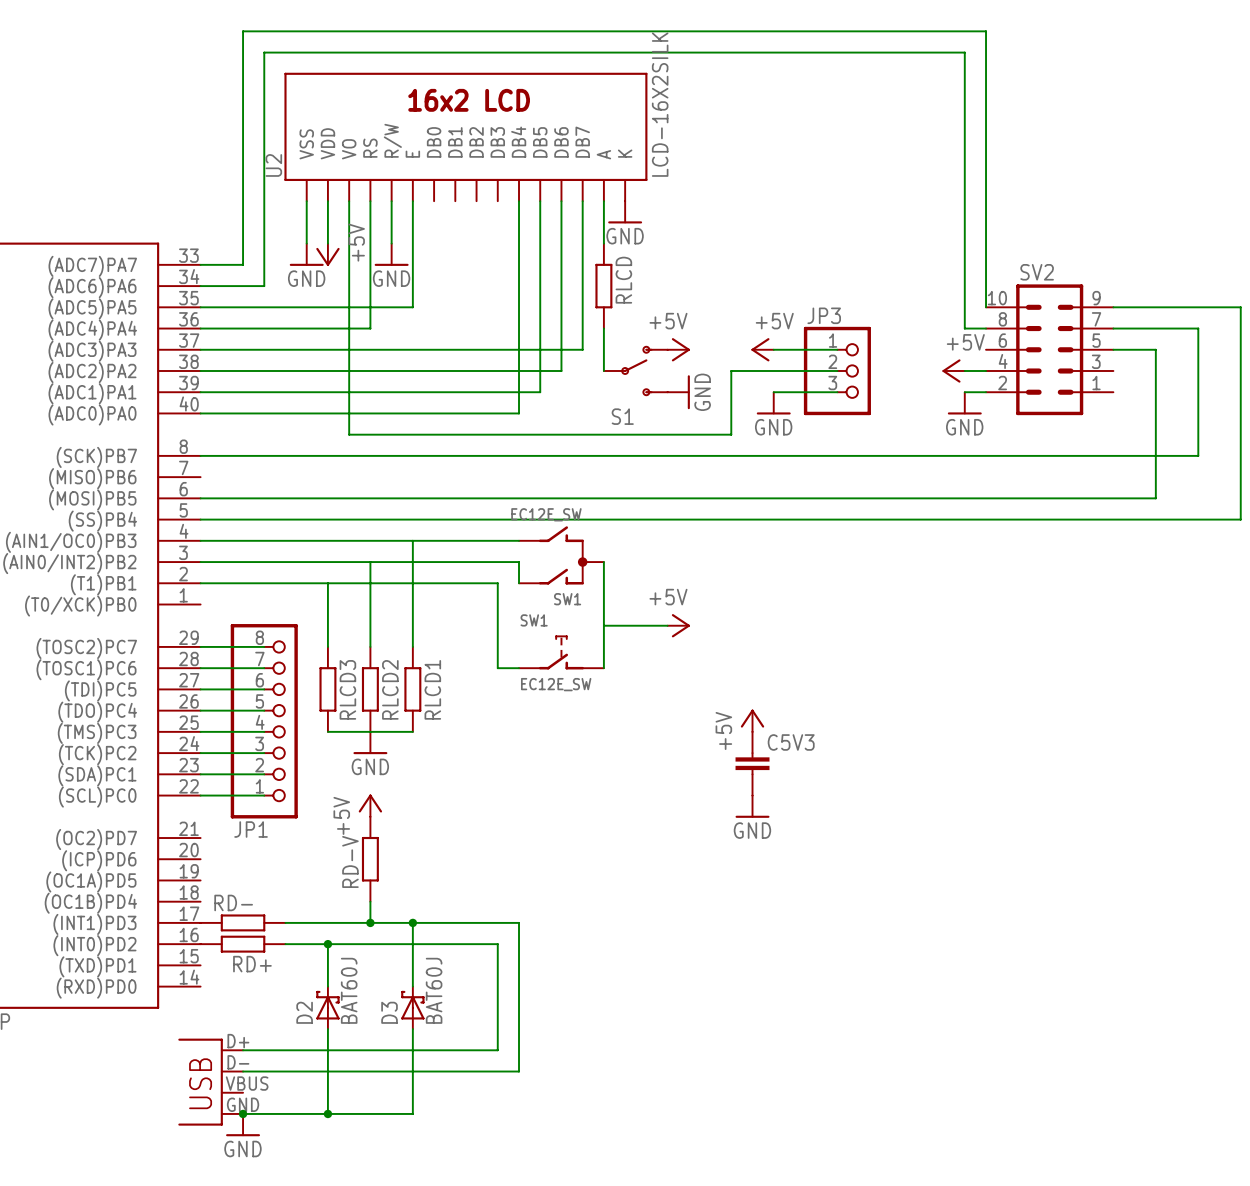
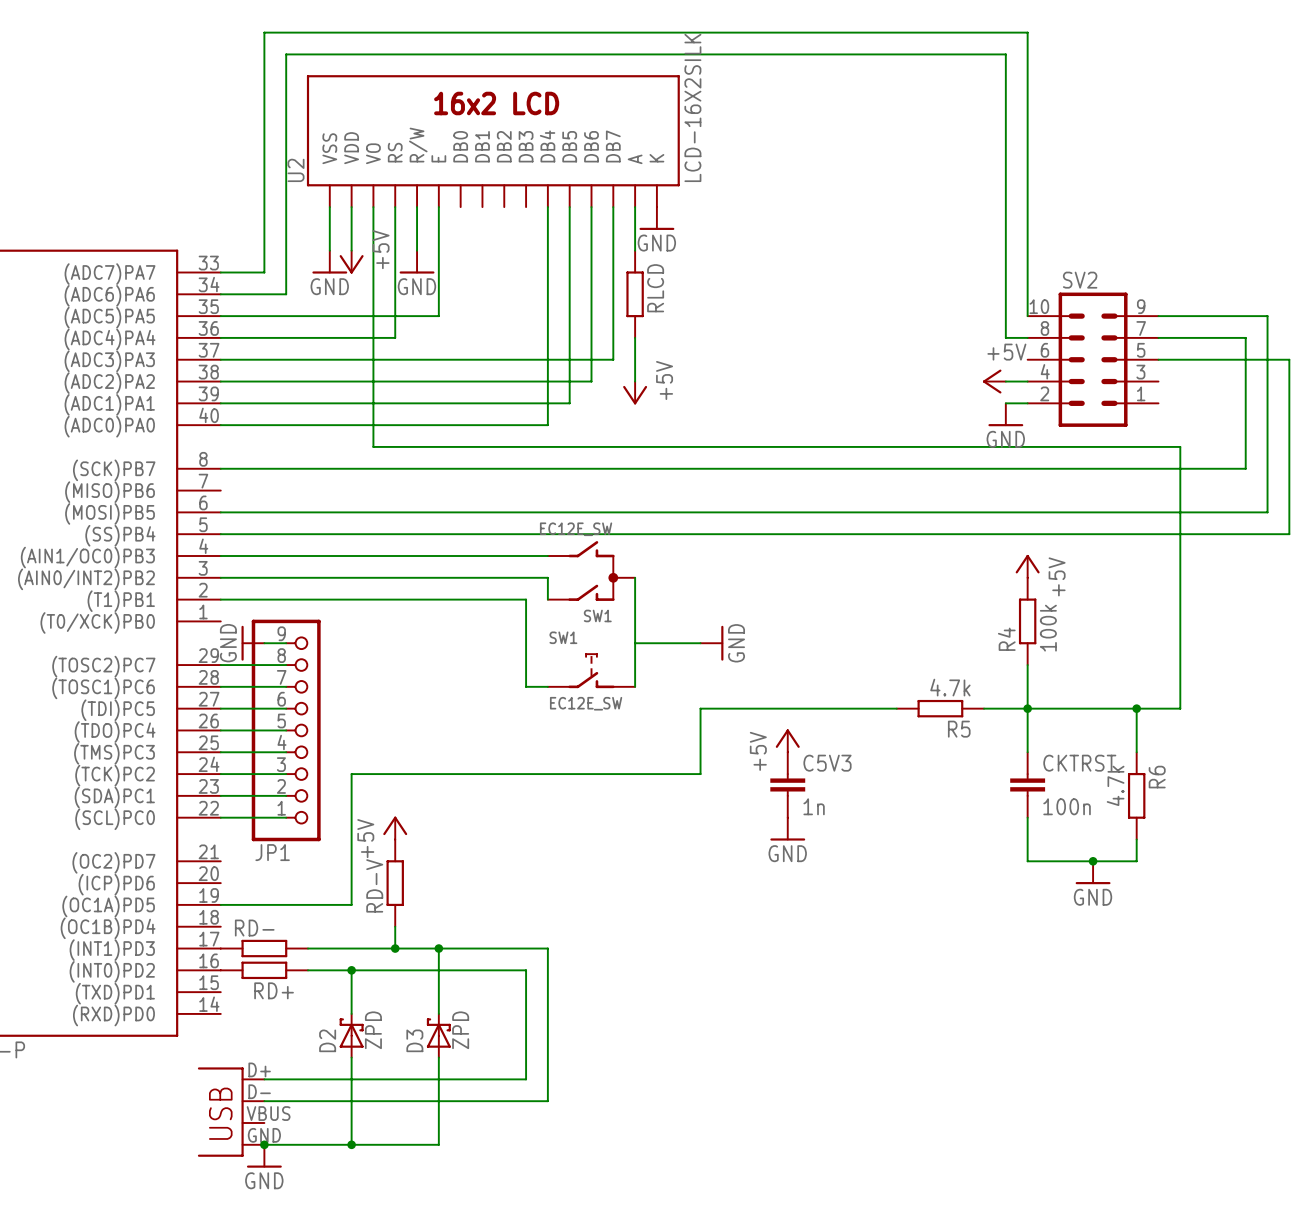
wire: (1219, 307) (1240, 307) (1240, 349) -> (1202, 359) (1289, 359)
power symbol: +5V (678, 349) -> none
power symbol: +5V (762, 349) -> none
wire: (773, 349) (837, 349) -> none
wire: (1155, 349) (1155, 498) -> (1267, 316) (1267, 512) (1202, 512)
S1: (635, 370) -> none
wire: (837, 370) (731, 370) (731, 434) -> (984, 708) (1180, 708) (1180, 446) (765, 446)
JP3: (837, 370) -> none
power symbol: none -> +5V (635, 392)
power symbol: GND (678, 392) -> none
wire: (773, 392) (837, 392) -> none
power symbol: GND (773, 403) -> none
wire: (412, 540) (412, 646) -> none
power symbol: none -> +5V (1027, 566)
wire: (370, 562) (370, 646) -> none
wire: (327, 583) (327, 646) -> none
R4: none -> 100k (1027, 621)
JP1 symbol: [230, 624, 298, 819] -> [251, 619, 321, 842]
power symbol: +5V (678, 625) -> GND (711, 643)
wire: none -> (1027, 665) (1027, 752)
RLCD3: (327, 689) -> none
RLCD2: (370, 689) -> none
RLCD1: (412, 689) -> none
wire: none -> (896, 708) (700, 708) (700, 774) (351, 774) (351, 904) (220, 904)
R5: none -> 4.7k (940, 708)
junction: none -> (1027, 708)
wire: none -> (1136, 708) (1136, 752)
junction: none -> (1136, 708)
wire: (327, 731) (412, 731) -> none
power symbol position: GND (370, 743) -> GND (252, 643)
power symbol rotation: 0° (370, 753) -> 90° clockwise (242, 643)
CKTRST: none -> 100n (1027, 784)
R6: none -> 4.7k (1136, 795)
C5V3 value: none -> 1n (814, 806)
wire: none -> (1027, 817) (1027, 861) (1136, 861) (1136, 839)
junction: none -> (1093, 861)
power symbol: none -> GND (1093, 872)
D2 value: BAT60J (349, 990) -> ZPD (373, 1030)
D3 value: BAT60J (434, 990) -> ZPD (460, 1030)

